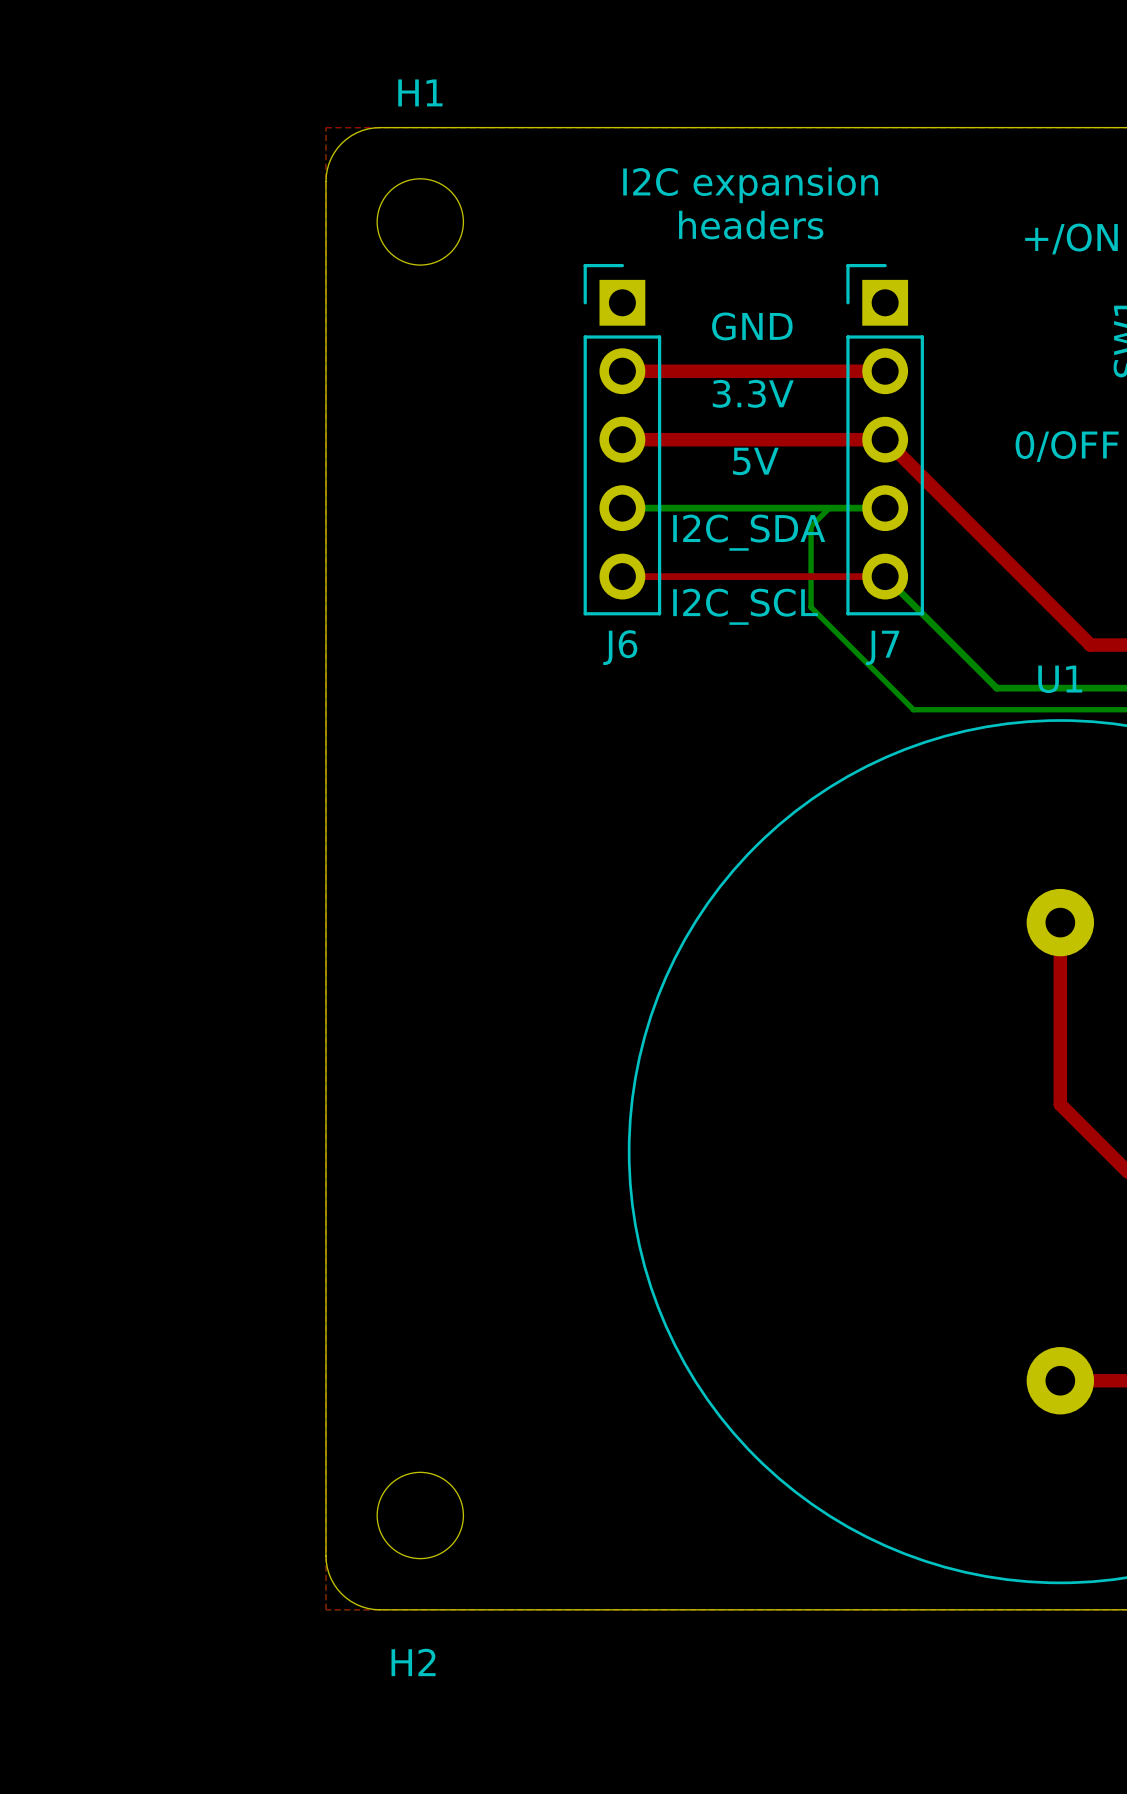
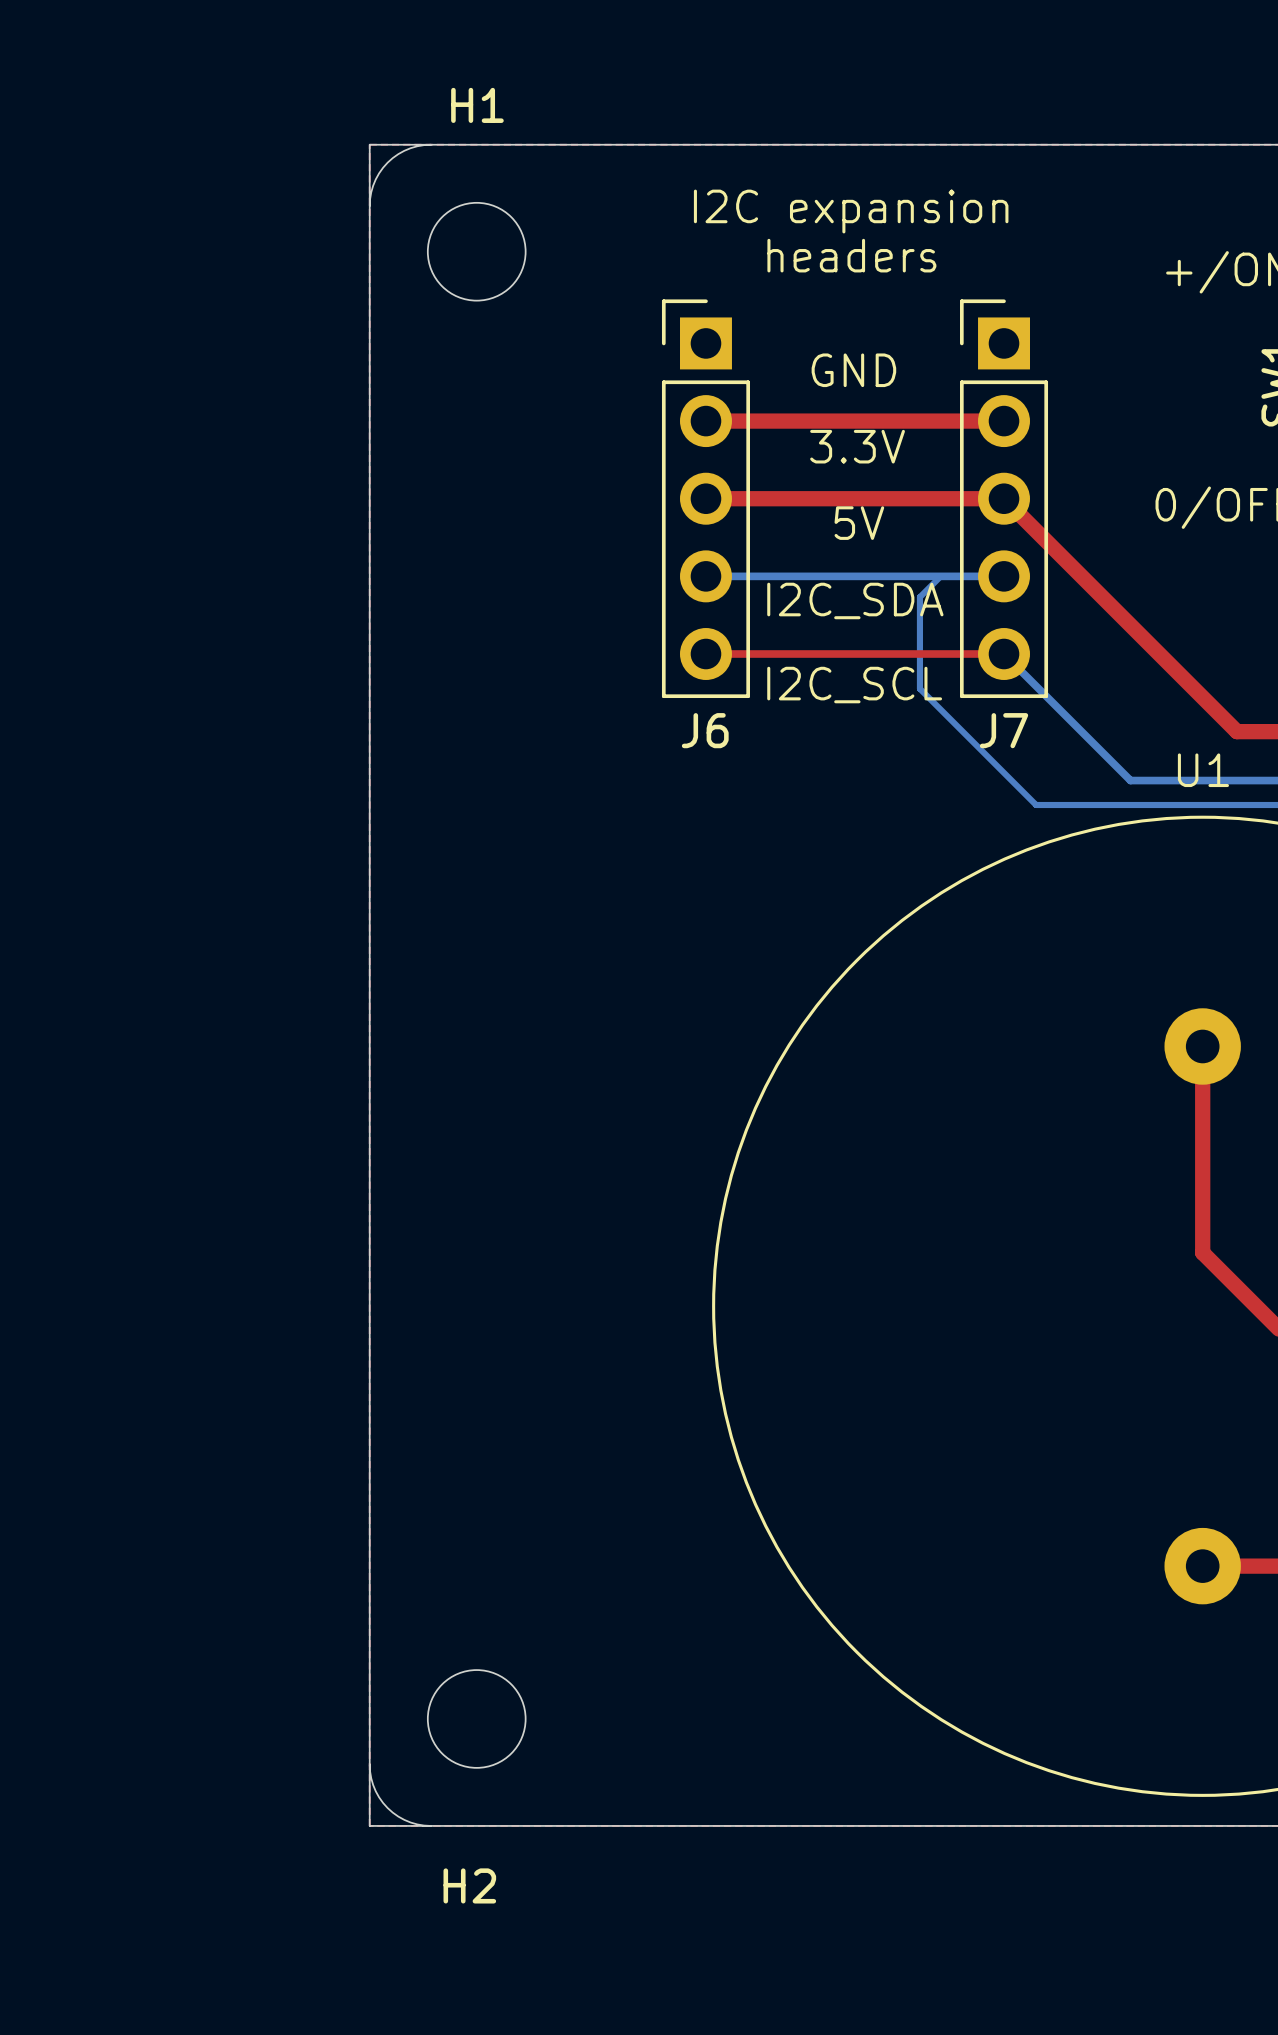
board edge: none -> (430, 144) (369, 144) (369, 205)
board edge: none -> (369, 1764) (369, 1825) (430, 1825)

